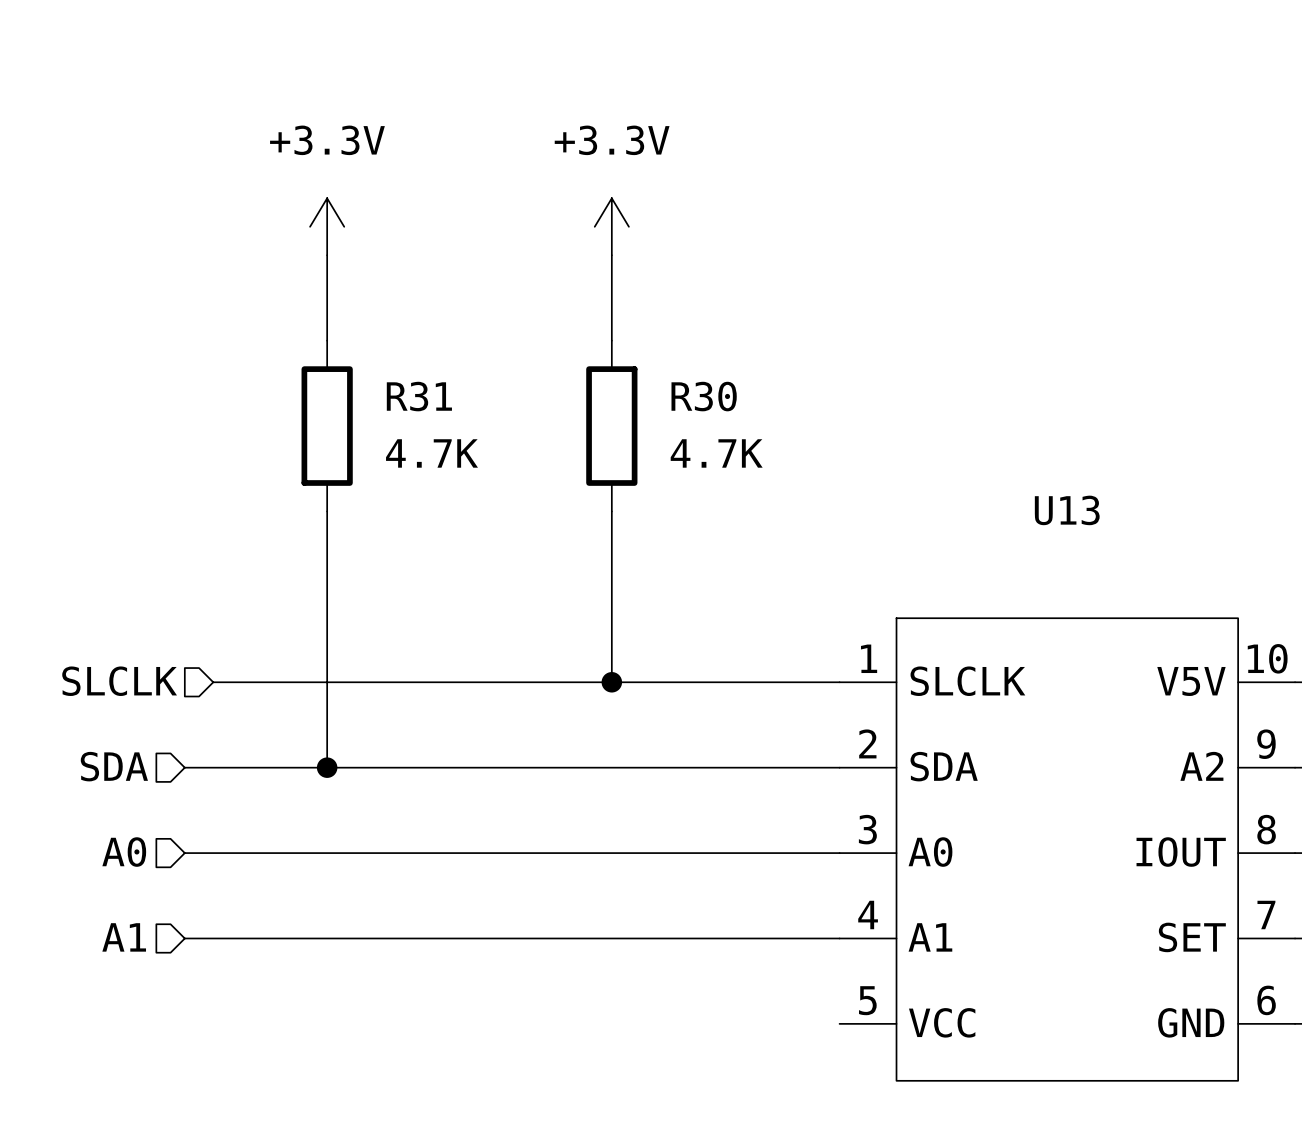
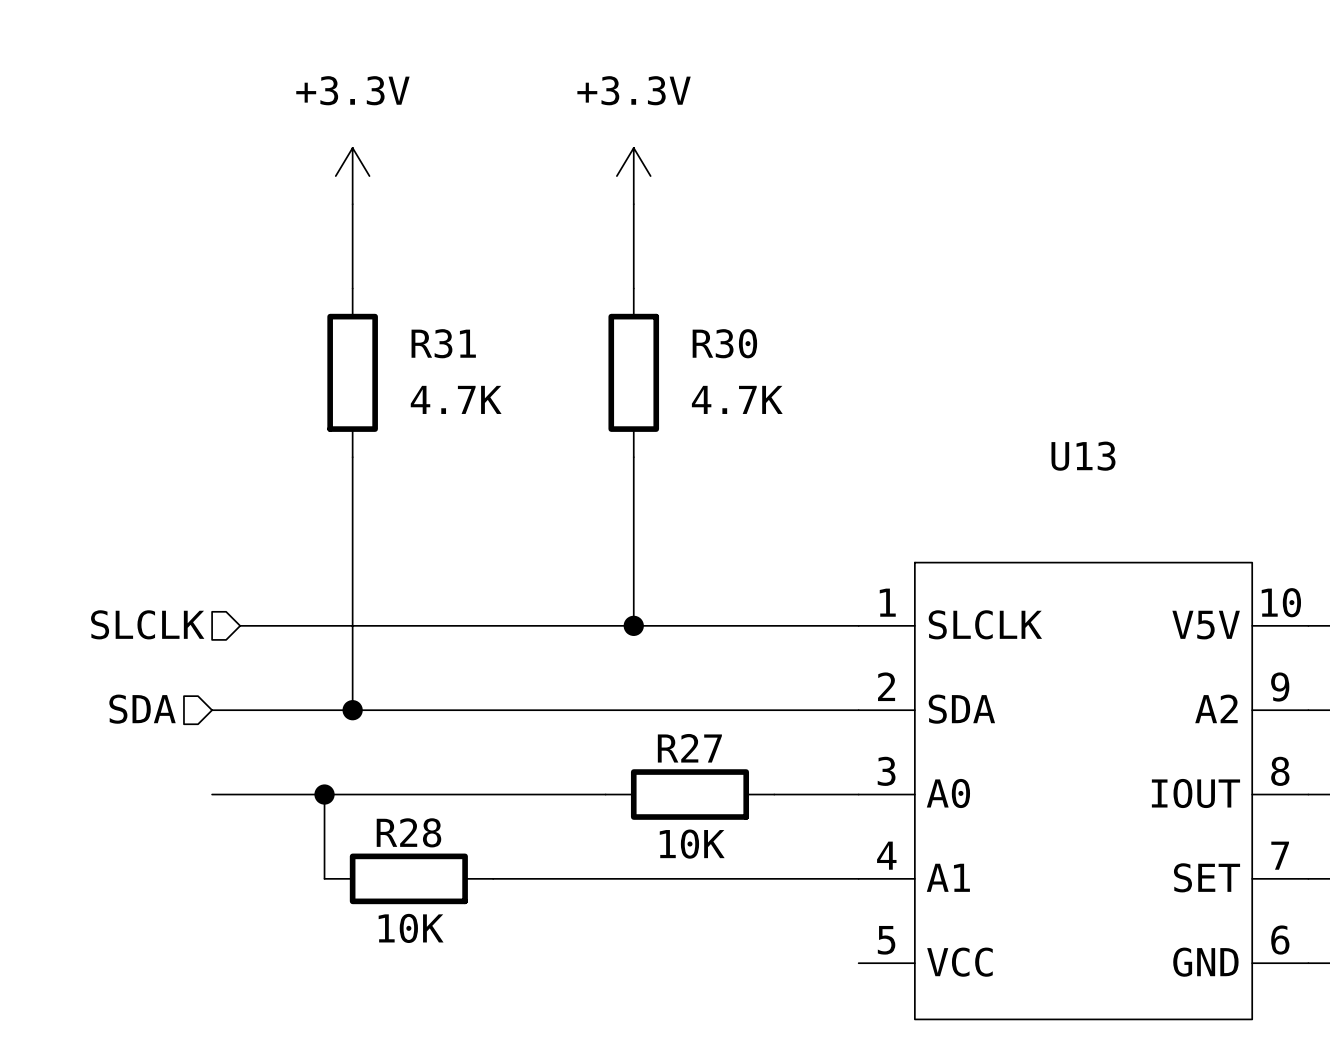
hierarchical label: A0 (124, 852) -> none
wire: none -> (324, 794) (324, 878)
junction: none -> (324, 794)
wire: (583, 853) (754, 853) -> none
R27: none -> 10K (689, 794)
hierarchical label: A1 (124, 937) -> none
wire: (184, 938) (469, 938) -> none
R28: none -> 10K (408, 878)

